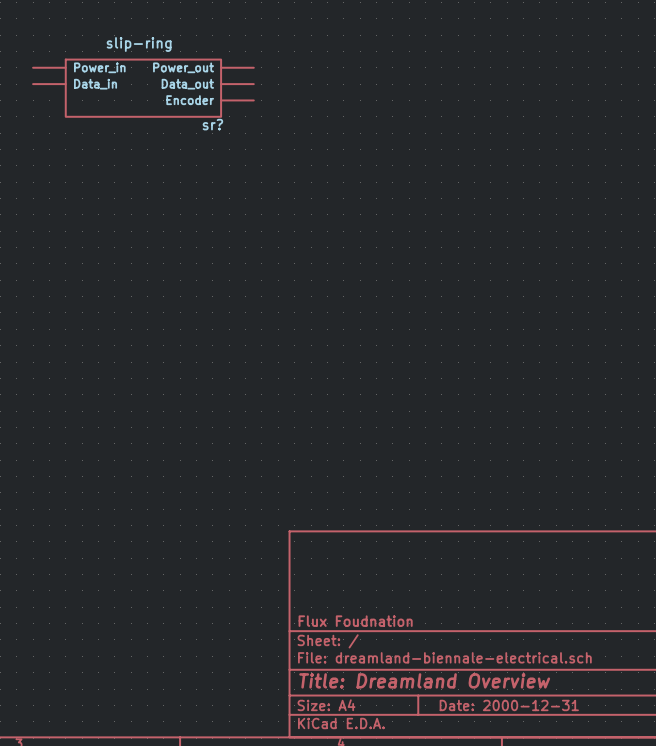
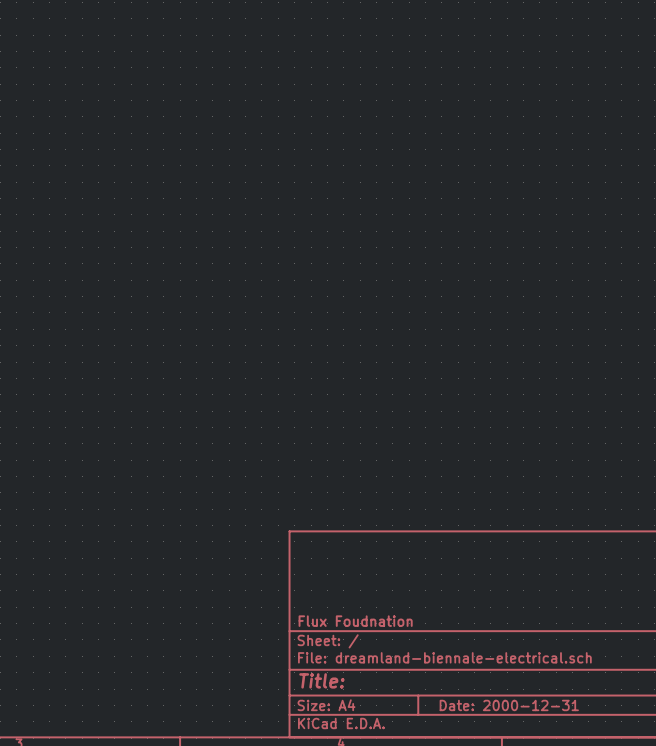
sr?: slip-ring (143, 88) -> none
title block: Title: Dreamland Overview (424, 680) -> Title: (321, 680)

